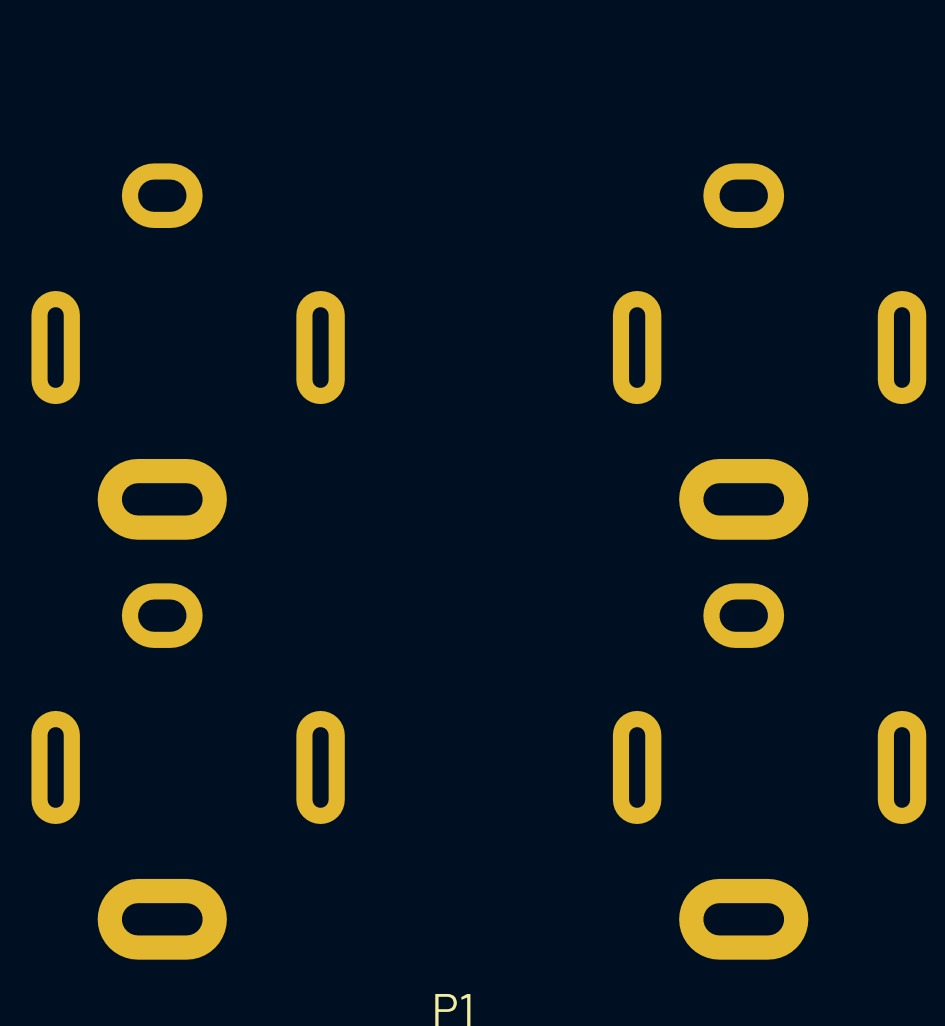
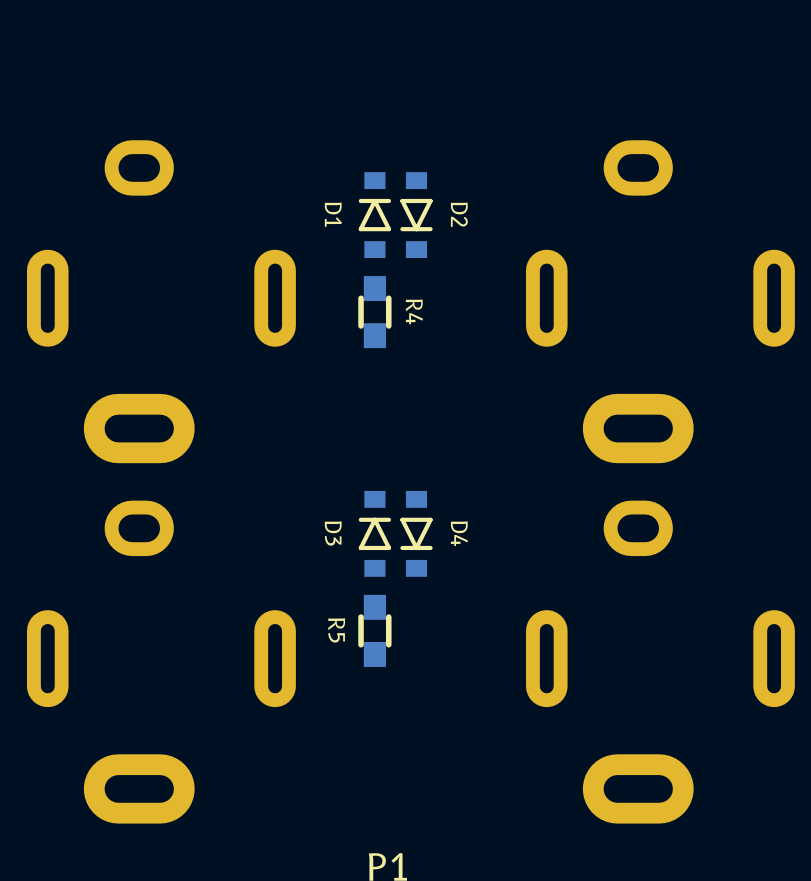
D1: none -> (374, 215)
D2: none -> (416, 215)
R4: none -> (374, 312)
D3: none -> (374, 533)
D4: none -> (416, 533)
R5: none -> (374, 630)

